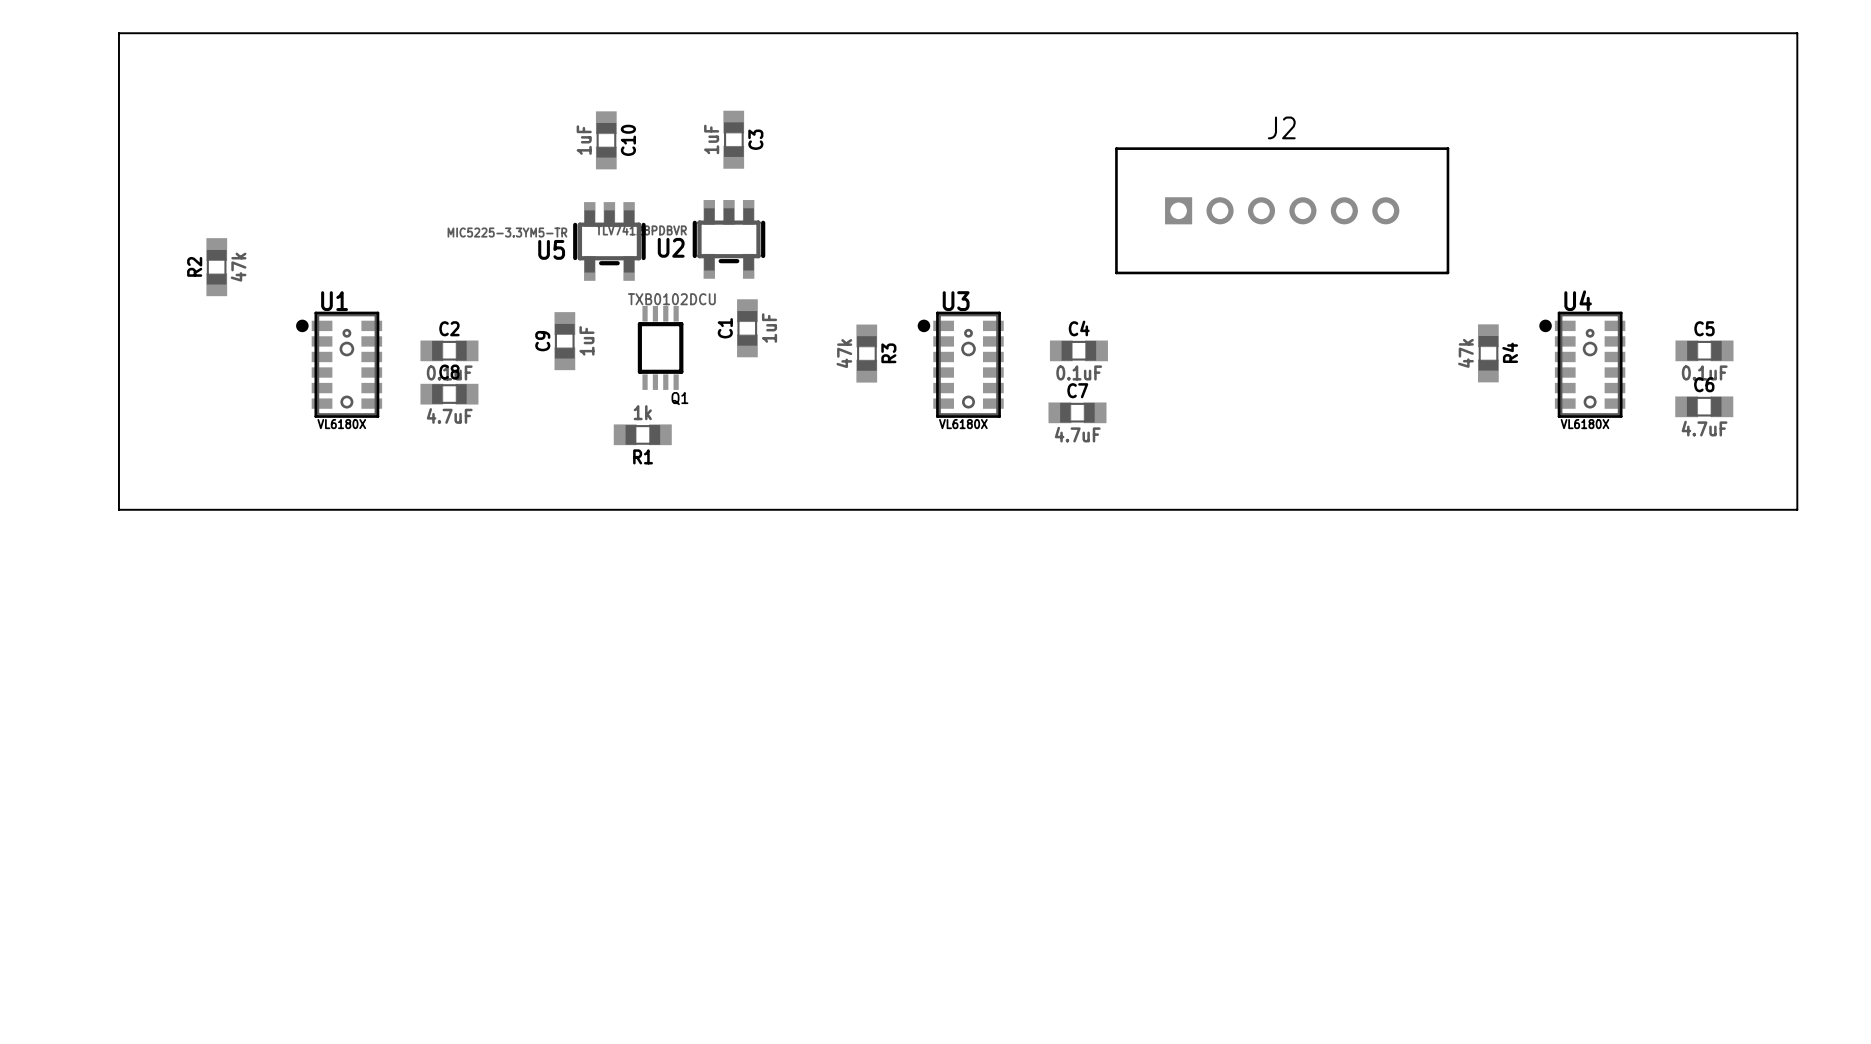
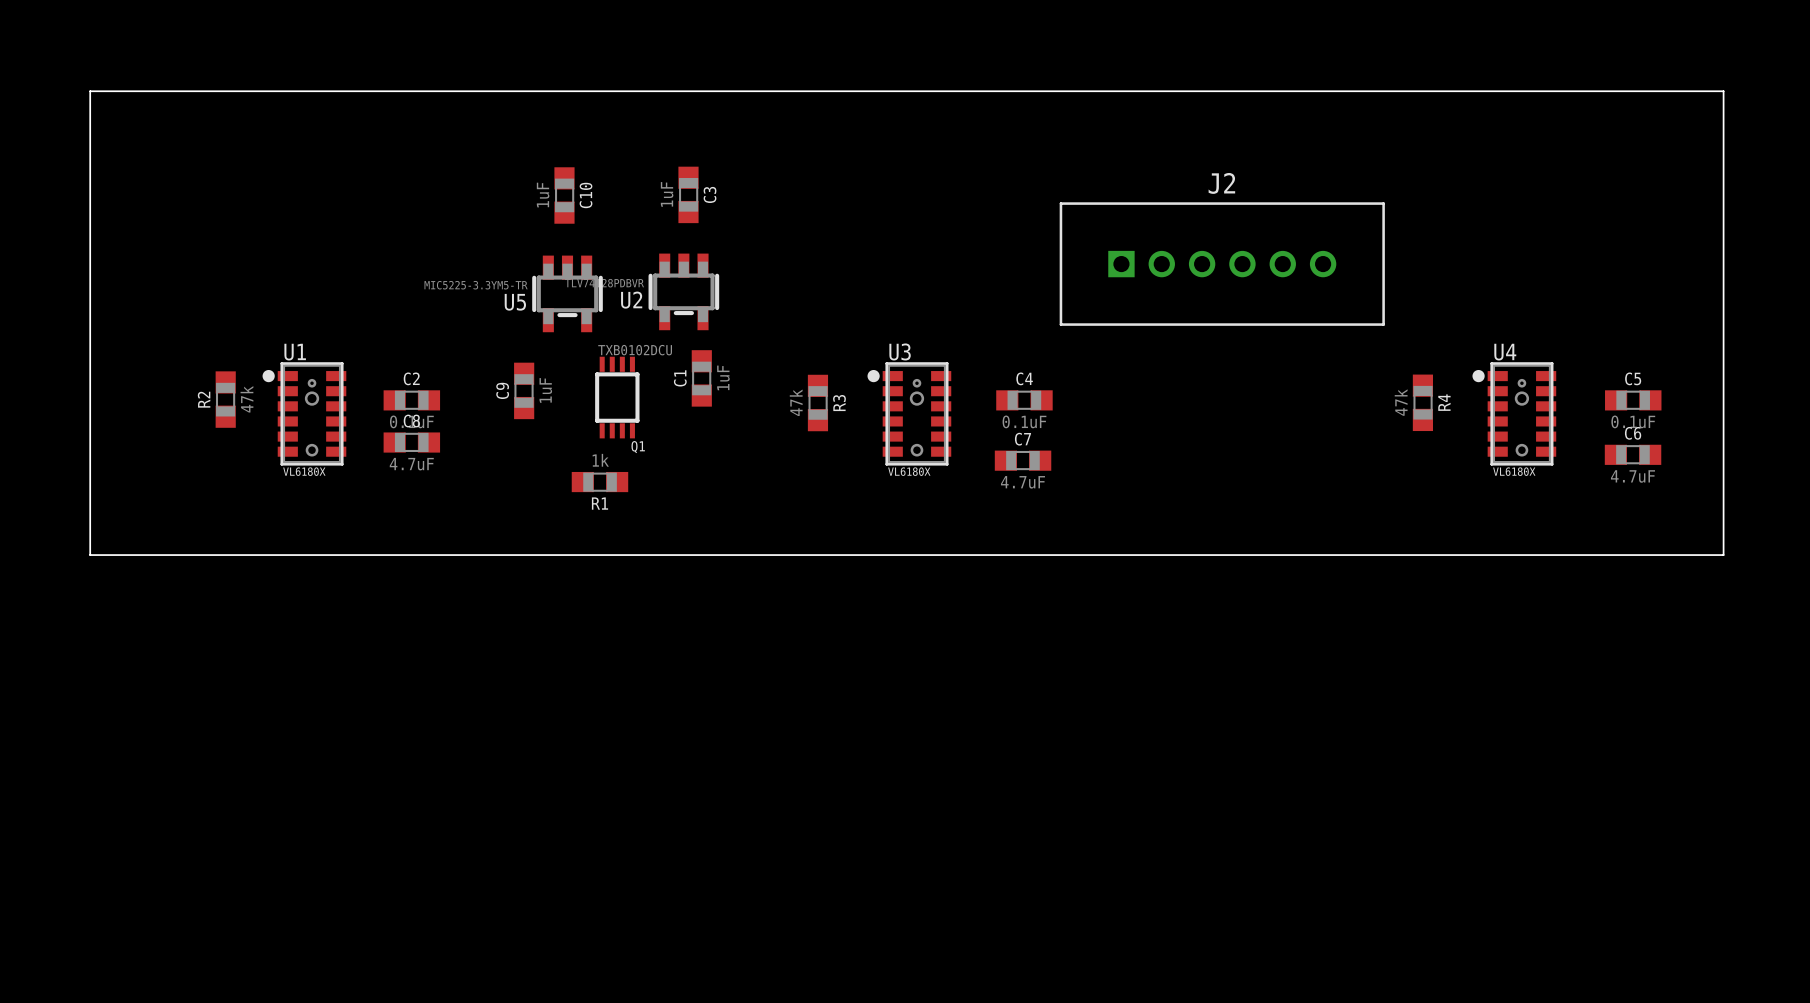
R2 position: (216, 267) -> (225, 399)

